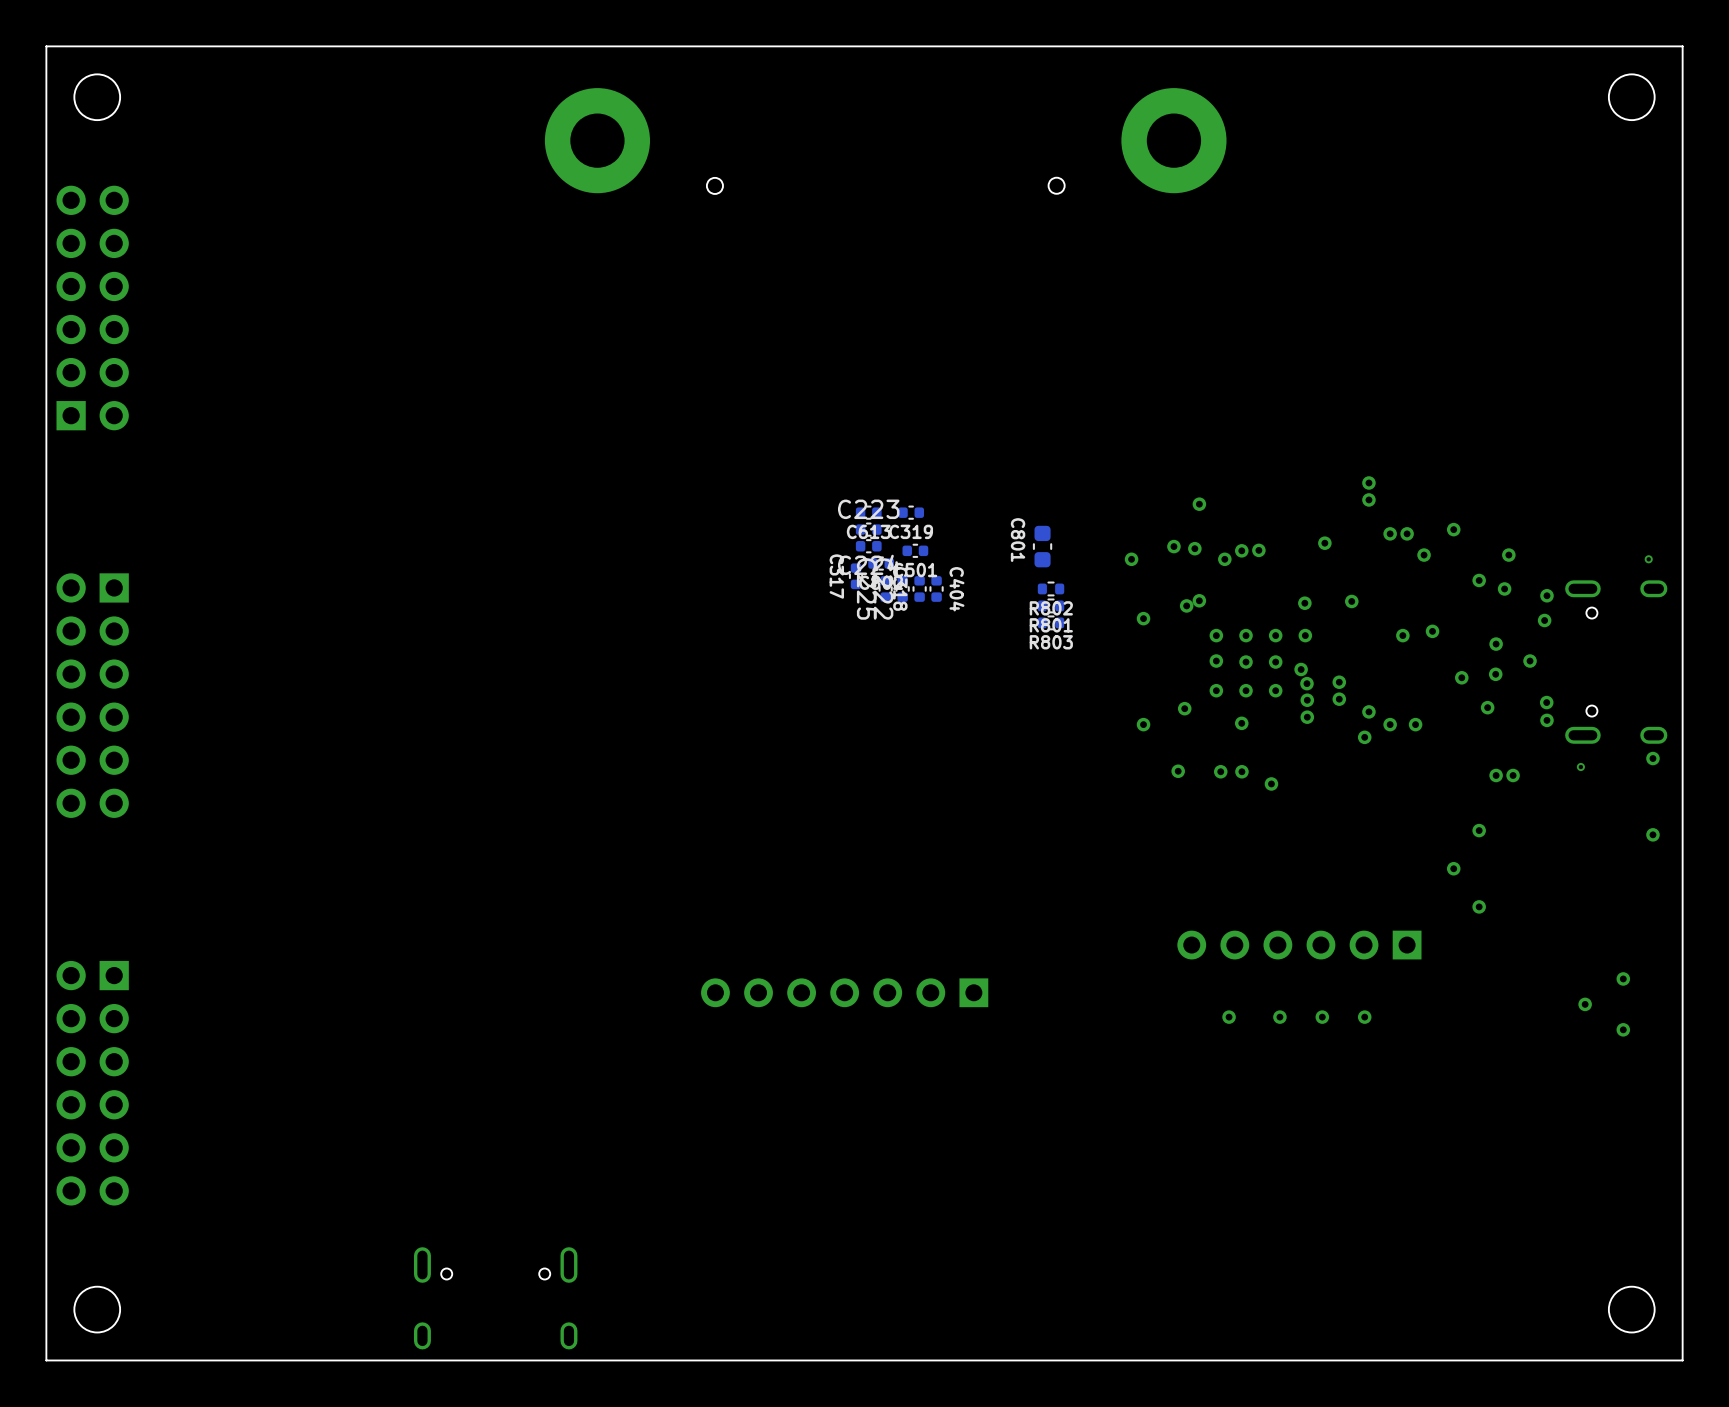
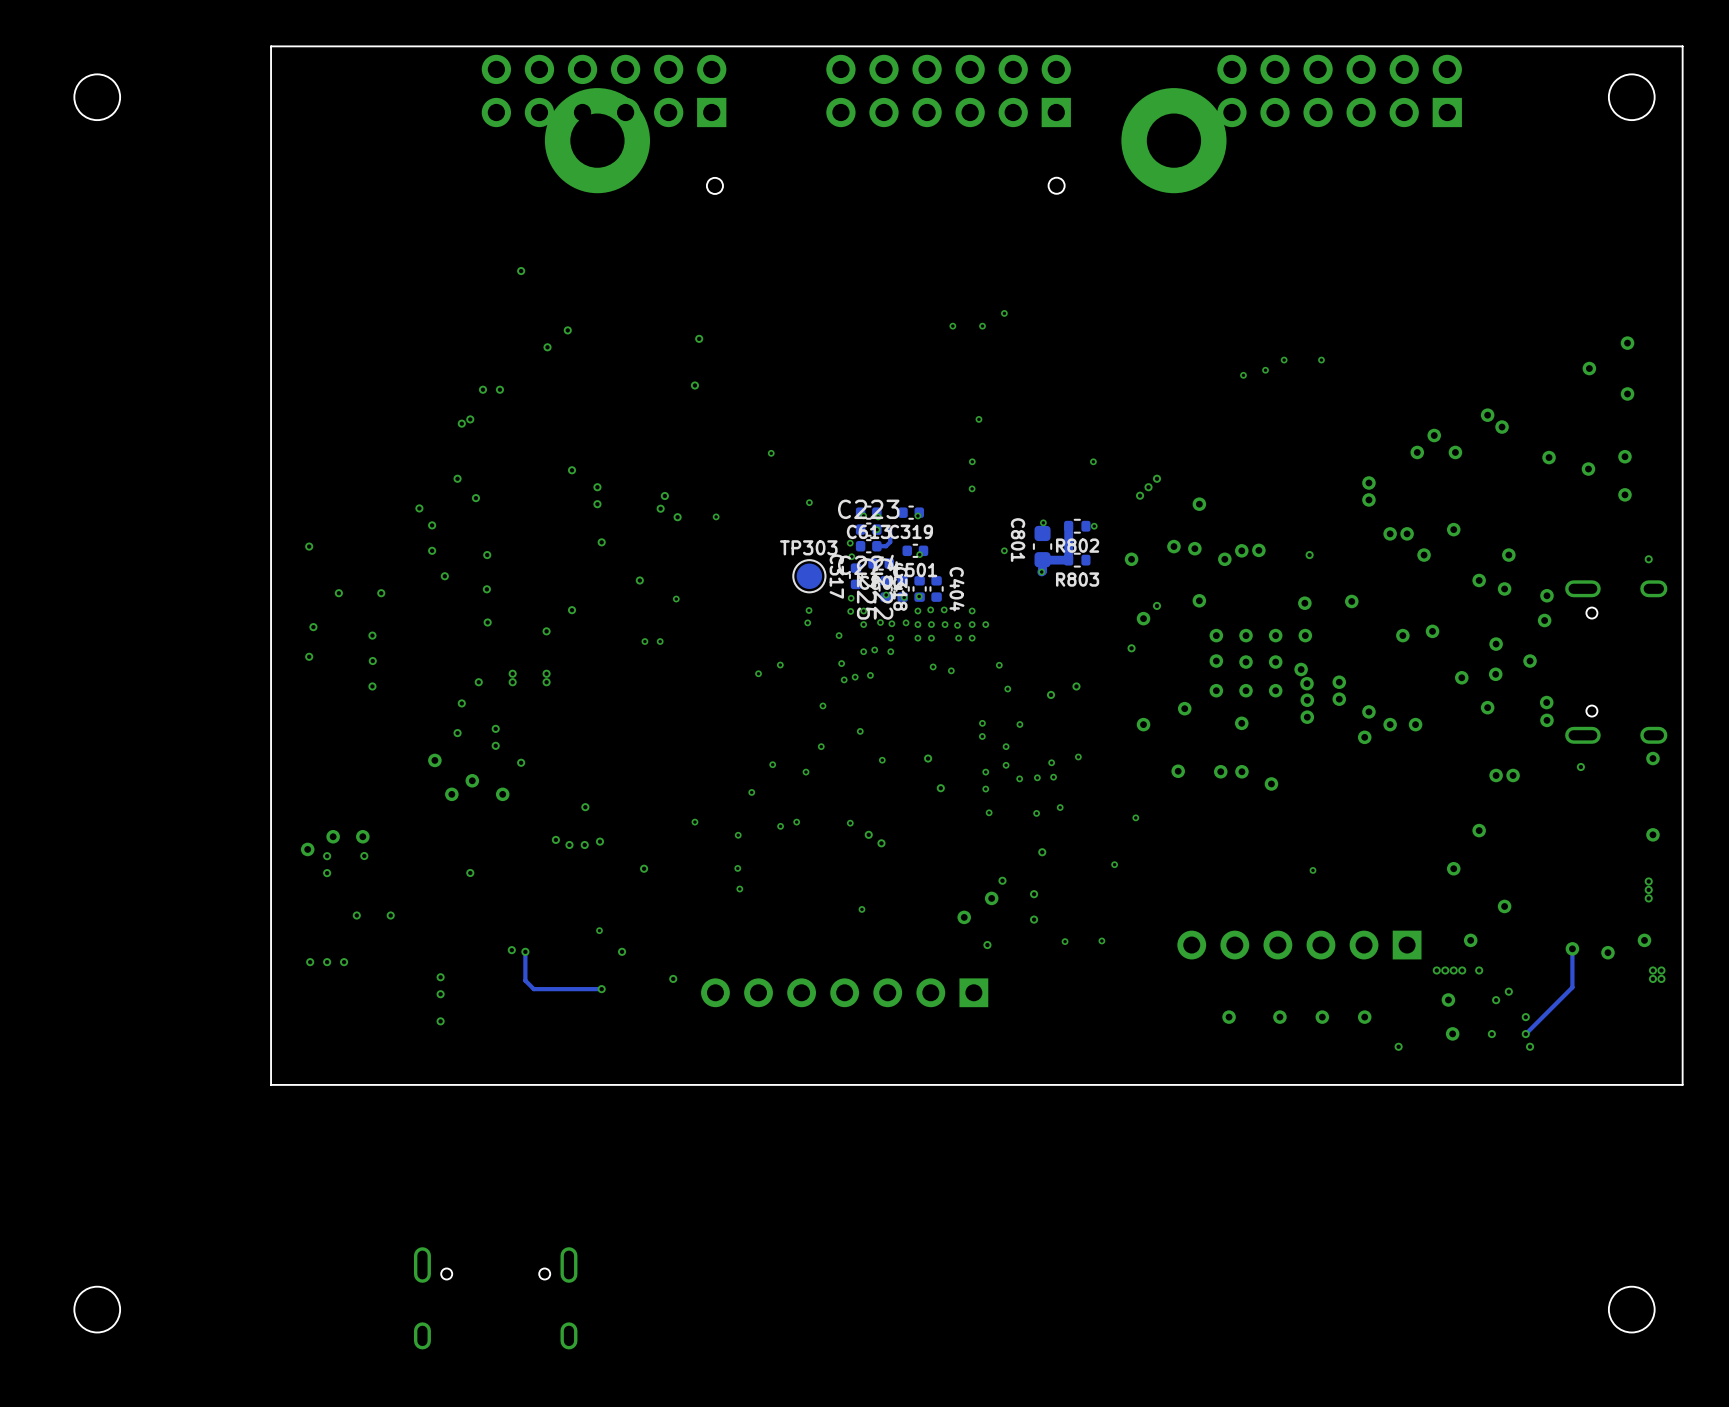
board edge: (271, 46) (46, 46) (46, 1360) (1682, 1360) (1682, 1084) -> (271, 46) (271, 1084) (1682, 1084)
part: none -> (604, 90)
part: none -> (948, 90)
part: none -> (1339, 90)
via: none -> (521, 271)
part: (92, 308) -> none
via: none -> (1004, 313)
via: none -> (952, 326)
via: none -> (982, 326)
via: none -> (567, 330)
via: none -> (699, 338)
via: none -> (1627, 343)
via: none -> (547, 347)
via: none -> (1284, 360)
via: none -> (1321, 360)
via: none -> (1589, 368)
via: none -> (1265, 370)
via: none -> (1243, 375)
via: none -> (694, 385)
via: none -> (482, 389)
via: none -> (499, 389)
via: none -> (1627, 393)
via: none -> (1487, 415)
via: none -> (470, 419)
via: none -> (978, 419)
via: none -> (461, 423)
via: none -> (1502, 427)
via: none -> (1434, 435)
via: none -> (1417, 452)
via: none -> (1455, 452)
via: none -> (771, 453)
via: none -> (1624, 456)
via: none -> (1549, 457)
via: none -> (972, 461)
via: none -> (1093, 461)
via: none -> (1588, 469)
via: none -> (572, 470)
via: none -> (457, 478)
via: none -> (1156, 478)
via: none -> (597, 487)
via: none -> (1148, 487)
via: none -> (972, 488)
via: none -> (1624, 494)
via: none -> (1140, 495)
via: none -> (664, 496)
via: none -> (475, 498)
via: none -> (809, 502)
via: none -> (597, 504)
via: none -> (419, 508)
via: none -> (660, 508)
via: none -> (863, 515)
via: none -> (917, 515)
via: none -> (716, 516)
via: none -> (878, 516)
via: none -> (677, 517)
via: none -> (1043, 522)
via: none -> (432, 525)
track: none -> (1068, 526) (1068, 560) (1042, 559) (1041, 572)
via: none -> (1094, 526)
via: none -> (876, 529)
track: none -> (890, 529) (890, 542) (886, 546) (876, 546)
via: none -> (601, 542)
via: none -> (850, 543)
via: (1324, 543) -> none
via: none -> (309, 546)
via: none -> (432, 550)
via: none -> (1004, 550)
via: none -> (919, 554)
via: none -> (487, 555)
via: none -> (1309, 555)
via: none -> (851, 556)
via: none -> (1041, 572)
via: none -> (444, 576)
TP303: none -> (809, 576)
via: none -> (639, 580)
R802 position: (1051, 588) -> (1077, 526)
via: none -> (486, 589)
via: none -> (338, 593)
via: none -> (381, 593)
via: none -> (886, 594)
via: none -> (919, 596)
via: none -> (904, 597)
via: none -> (851, 598)
via: none -> (676, 599)
R801: (1051, 605) -> none
via: none -> (1156, 605)
via: (1186, 605) -> none
via: none -> (930, 609)
via: none -> (944, 609)
via: none -> (572, 610)
via: none -> (809, 610)
via: none -> (850, 611)
via: none -> (863, 611)
via: none -> (917, 611)
via: none -> (972, 611)
via: none -> (487, 622)
via: none -> (807, 622)
via: none -> (880, 622)
via: none -> (906, 622)
R803 position: (1051, 622) -> (1077, 560)
via: none -> (891, 623)
via: none -> (863, 624)
via: none -> (917, 624)
via: none -> (931, 624)
via: none -> (945, 624)
via: none -> (972, 624)
via: none -> (985, 624)
via: none -> (957, 625)
via: none -> (313, 627)
via: none -> (546, 631)
via: none -> (372, 635)
via: none -> (839, 635)
via: none -> (890, 638)
via: none -> (917, 638)
via: none -> (931, 638)
via: none -> (958, 638)
via: none -> (972, 638)
via: none -> (644, 641)
via: none -> (660, 641)
via: none -> (1131, 648)
via: none -> (874, 649)
via: none -> (863, 651)
via: none -> (890, 651)
via: none -> (309, 656)
via: none -> (372, 661)
via: none -> (841, 663)
via: none -> (780, 665)
via: none -> (999, 665)
via: none -> (933, 666)
via: none -> (951, 670)
via: none -> (512, 673)
via: none -> (546, 673)
via: none -> (758, 673)
via: none -> (870, 675)
via: none -> (855, 677)
via: none -> (844, 679)
via: none -> (478, 682)
via: none -> (512, 682)
via: none -> (546, 682)
via: none -> (372, 686)
via: none -> (1076, 686)
via: none -> (1007, 689)
via: none -> (1051, 694)
part: (92, 695) -> none
via: none -> (461, 703)
via: none -> (822, 705)
via: none -> (982, 723)
via: none -> (1019, 724)
via: none -> (495, 728)
via: none -> (860, 731)
via: none -> (457, 733)
via: none -> (982, 736)
via: none -> (495, 745)
via: none -> (821, 746)
via: none -> (1006, 746)
via: none -> (1078, 757)
via: none -> (928, 758)
via: none -> (434, 760)
via: none -> (882, 760)
via: none -> (521, 762)
via: none -> (1051, 762)
via: none -> (772, 764)
via: none -> (1006, 765)
via: none -> (806, 772)
via: none -> (985, 772)
via: none -> (1037, 777)
via: none -> (1053, 777)
via: none -> (1019, 778)
via: none -> (472, 780)
via: none -> (940, 788)
via: none -> (985, 789)
via: none -> (751, 792)
via: none -> (451, 794)
via: none -> (502, 794)
via: none -> (585, 807)
via: none -> (1060, 807)
via: none -> (989, 812)
via: none -> (1036, 813)
via: none -> (1135, 817)
via: none -> (694, 822)
via: none -> (796, 822)
via: none -> (850, 823)
via: none -> (780, 826)
via: none -> (868, 834)
via: none -> (738, 835)
via: none -> (333, 836)
via: none -> (362, 836)
via: none -> (555, 839)
via: none -> (599, 841)
via: none -> (881, 843)
via: none -> (569, 845)
via: none -> (584, 845)
via: none -> (307, 849)
via: none -> (1042, 852)
via: none -> (327, 856)
via: none -> (364, 856)
via: none -> (1114, 864)
via: none -> (644, 868)
via: none -> (737, 868)
via: none -> (1312, 870)
via: none -> (470, 872)
via: none -> (327, 873)
via: none -> (1002, 880)
via: none -> (1648, 881)
via: none -> (739, 889)
via: none -> (1648, 889)
via: none -> (1034, 894)
via: none -> (991, 898)
via: none -> (1648, 898)
via: (1479, 906) -> none
via: none -> (1504, 906)
via: none -> (861, 909)
via: none -> (356, 915)
via: none -> (390, 915)
via: none -> (964, 917)
via: none -> (1034, 919)
via: none -> (599, 930)
via: none -> (1101, 940)
via: none -> (1470, 940)
via: none -> (1644, 940)
via: none -> (1065, 941)
via: none -> (987, 945)
track: none -> (1572, 948) (1572, 987) (1525, 1034)
via: none -> (1572, 948)
via: none -> (511, 950)
track: none -> (525, 951) (525, 980) (533, 989) (601, 989)
via: none -> (525, 951)
via: none -> (622, 951)
via: none -> (1607, 952)
via: none -> (310, 962)
via: none -> (327, 962)
via: none -> (344, 962)
via: none -> (1436, 970)
via: none -> (1445, 970)
via: none -> (1453, 970)
via: none -> (1462, 970)
via: none -> (1479, 970)
via: none -> (1652, 970)
via: none -> (1661, 970)
via: none -> (440, 977)
via: none -> (673, 978)
via: (1623, 978) -> none
via: none -> (1652, 978)
via: none -> (1661, 978)
via: none -> (601, 989)
via: none -> (1508, 991)
via: none -> (440, 994)
via: none -> (1448, 999)
via: none -> (1496, 1000)
via: (1585, 1004) -> none
via: none -> (1525, 1017)
via: none -> (440, 1021)
via: (1623, 1029) -> none
via: none -> (1452, 1033)
via: none -> (1491, 1034)
via: none -> (1525, 1034)
via: none -> (1398, 1046)
via: none -> (1530, 1046)
part: (92, 1083) -> none

